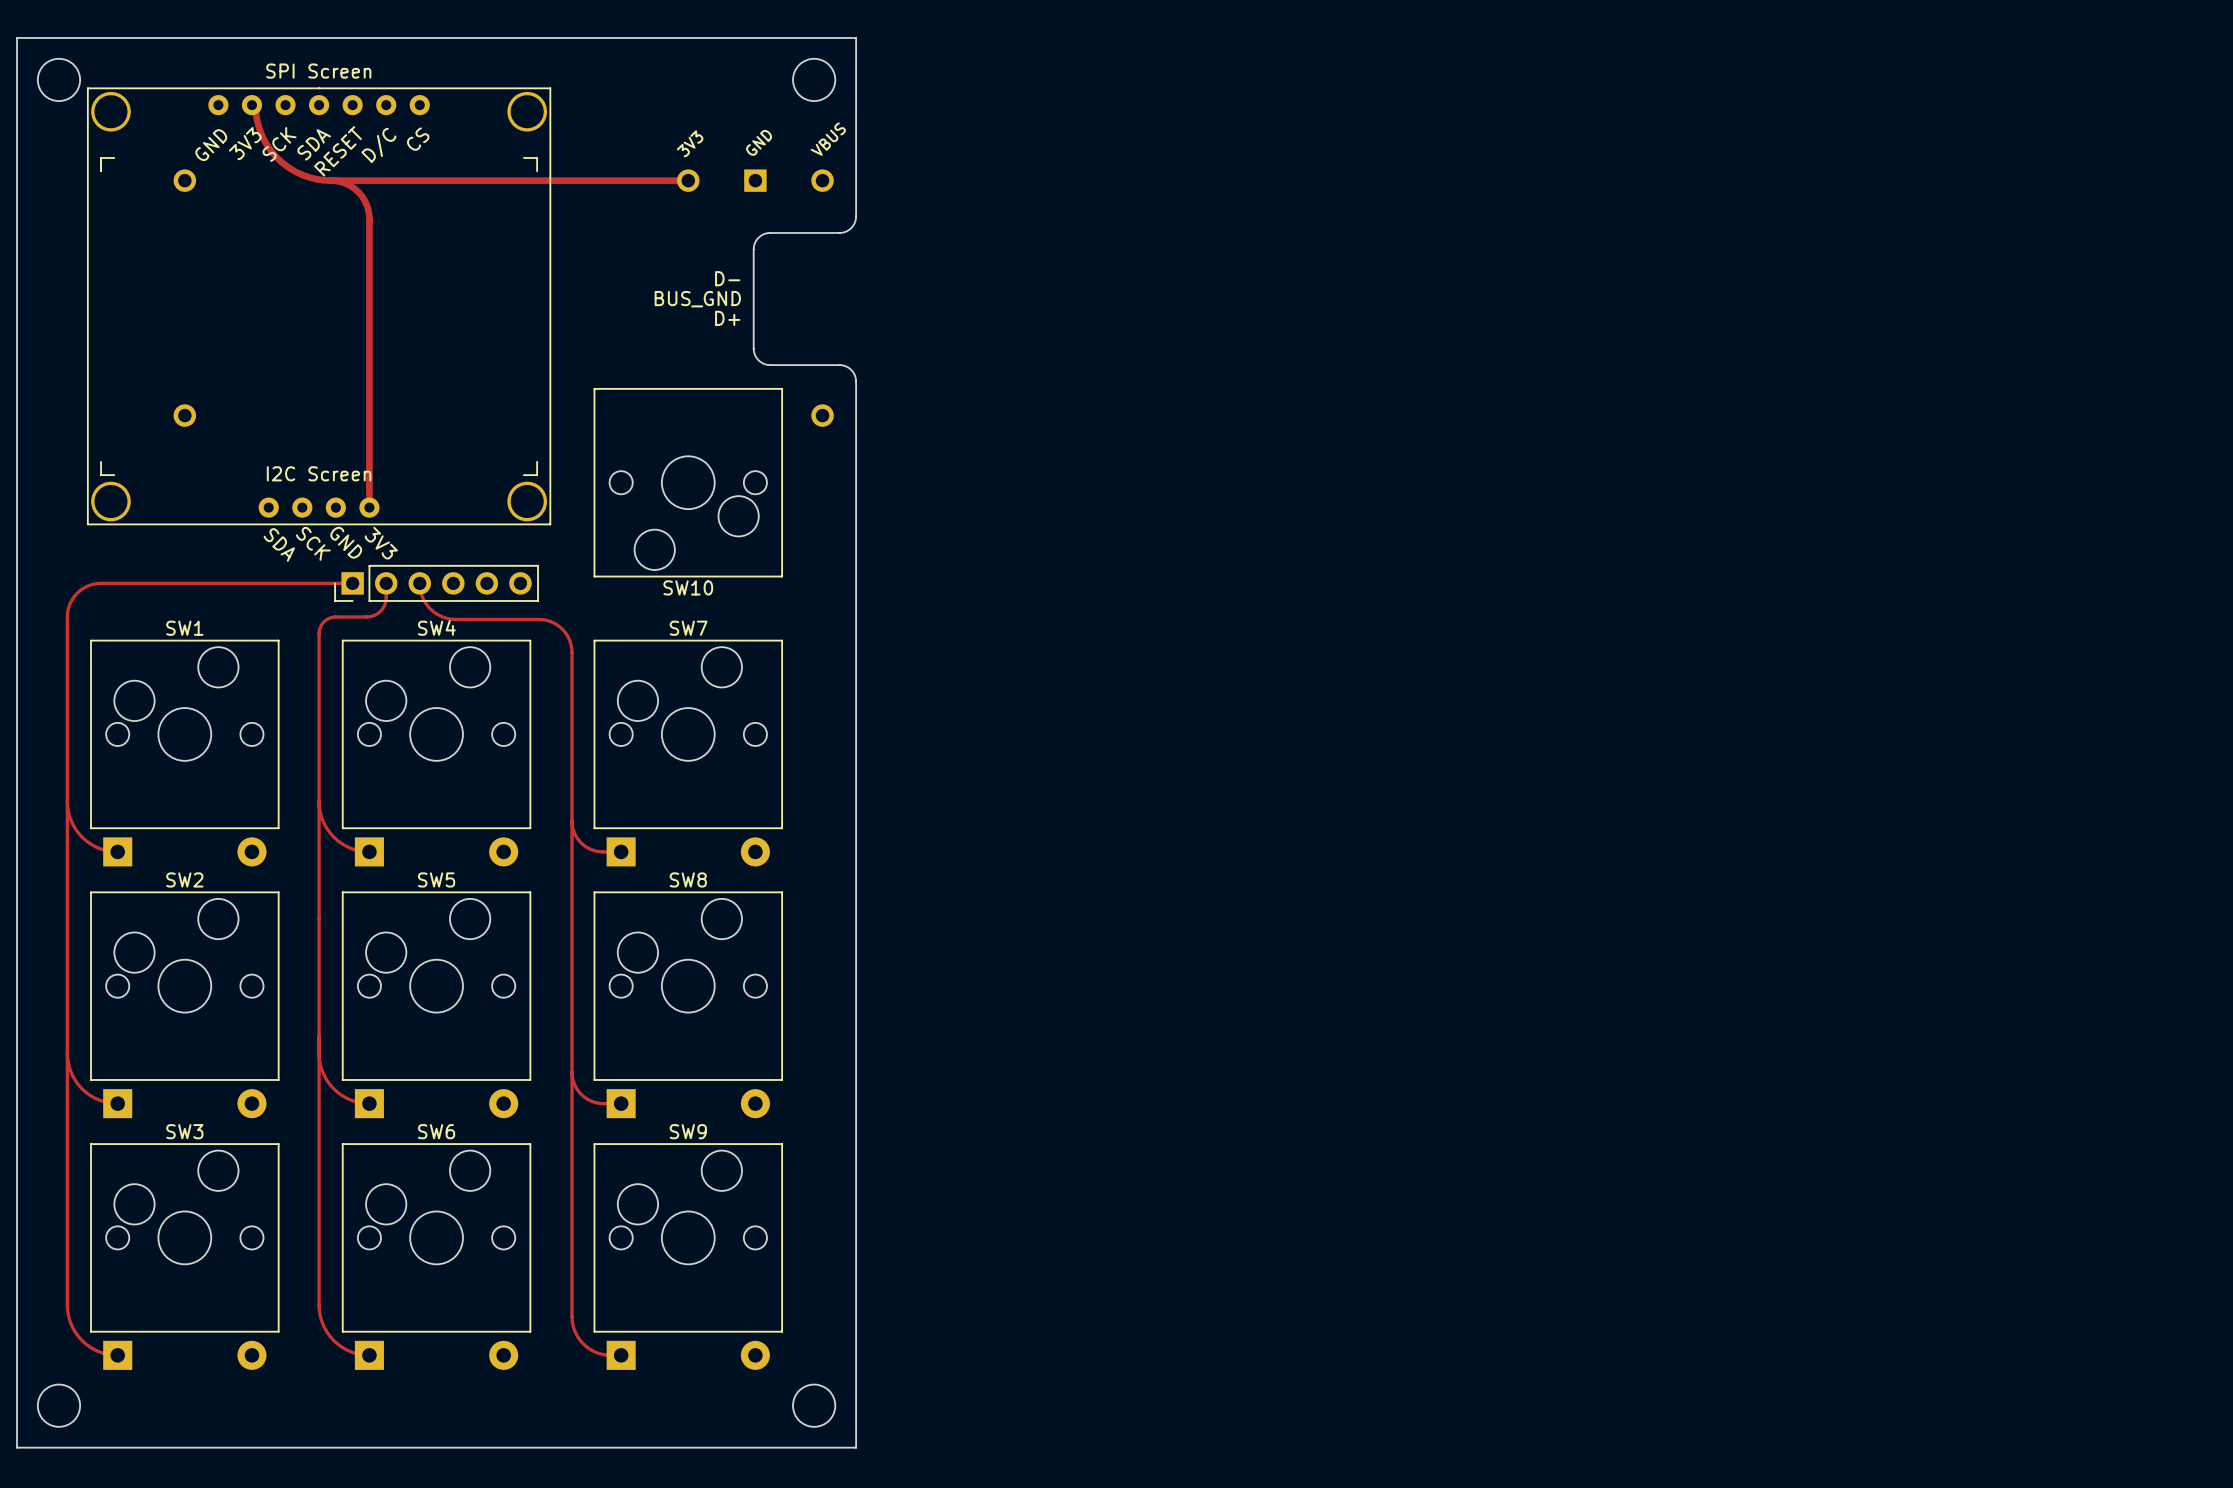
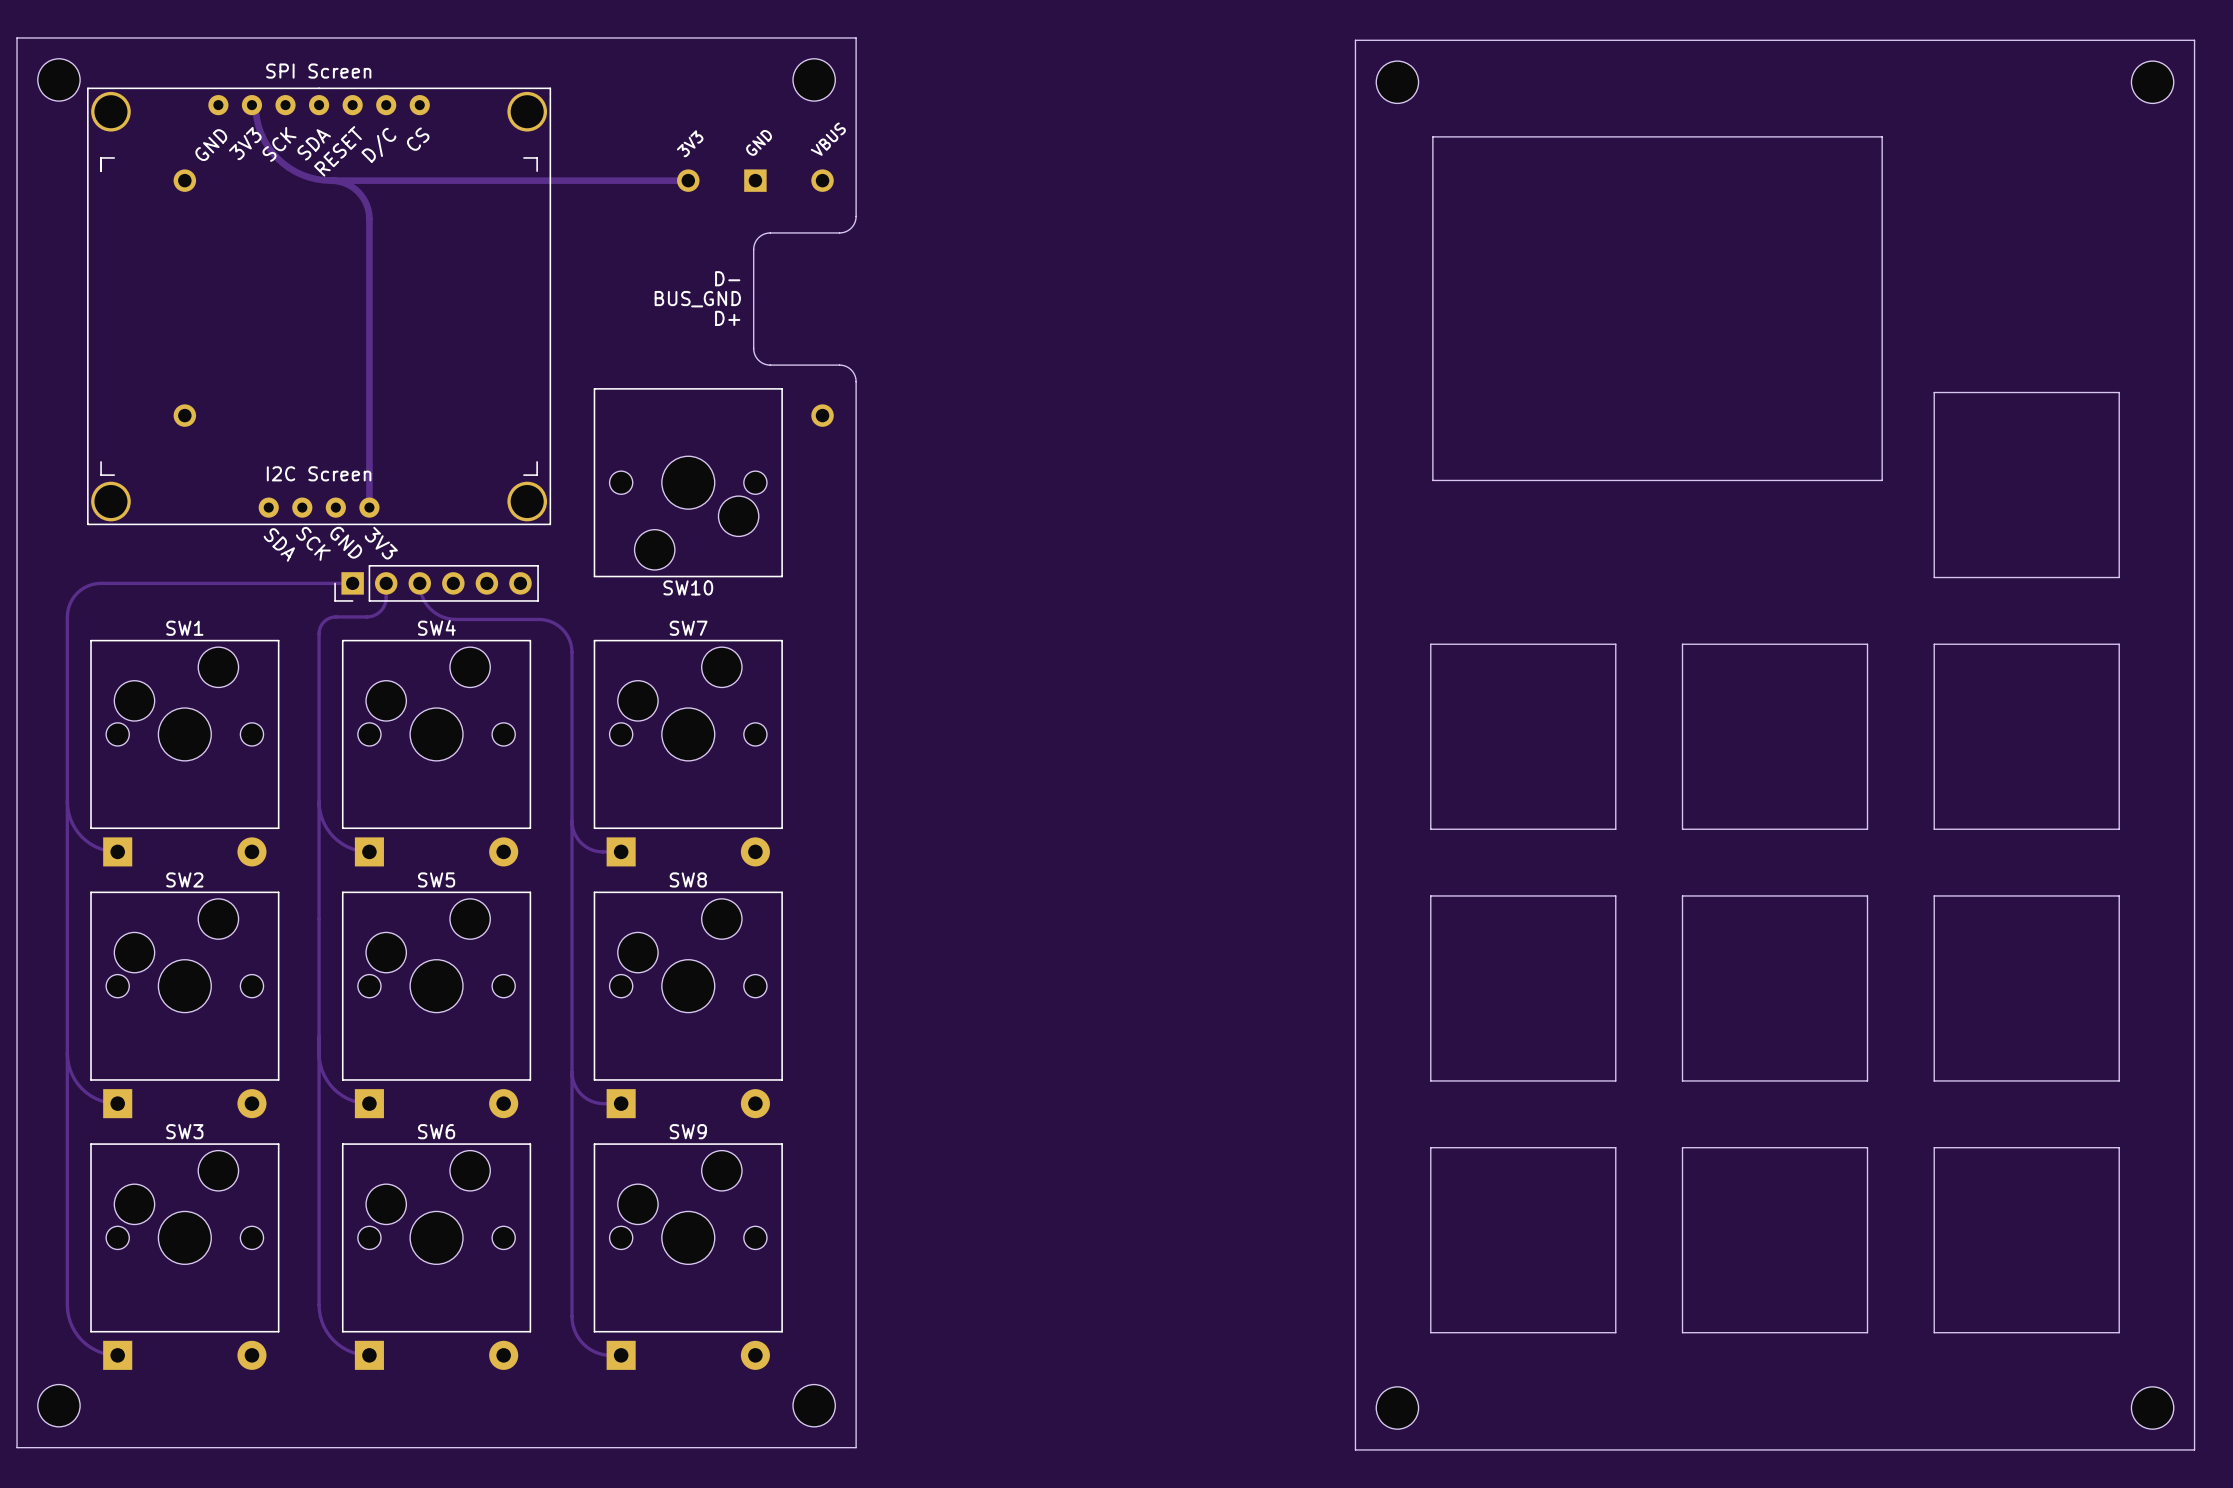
board edge: none -> (1355, 40) (1355, 1449) (2194, 1449) (2194, 40) (1355, 40)
part: none -> (1397, 82)
part: none -> (2152, 82)
board edge: none -> (1432, 136) (1882, 136) (1882, 480) (1432, 480) (1432, 136)
board edge: none -> (1934, 392) (1934, 577) (2119, 577) (2119, 392) (1934, 392)
board edge: none -> (1430, 644) (1430, 829) (1615, 829) (1615, 644) (1430, 644)
board edge: none -> (1682, 644) (1867, 644) (1867, 829) (1682, 829) (1682, 644)
board edge: none -> (1934, 644) (2119, 644) (2119, 829) (1934, 829) (1934, 644)
board edge: none -> (1430, 895) (1430, 1080) (1615, 1080) (1615, 895) (1430, 895)
board edge: none -> (1682, 895) (1867, 895) (1867, 1080) (1682, 1080) (1682, 895)
board edge: none -> (1934, 895) (1934, 1080) (2119, 1080) (2119, 895) (1934, 895)
board edge: none -> (1430, 1147) (1615, 1147) (1615, 1332) (1430, 1332) (1430, 1147)
board edge: none -> (1682, 1147) (1867, 1147) (1867, 1332) (1682, 1332) (1682, 1147)
board edge: none -> (1934, 1147) (2119, 1147) (2119, 1332) (1934, 1332) (1934, 1147)
part: none -> (1397, 1408)
part: none -> (2152, 1408)

